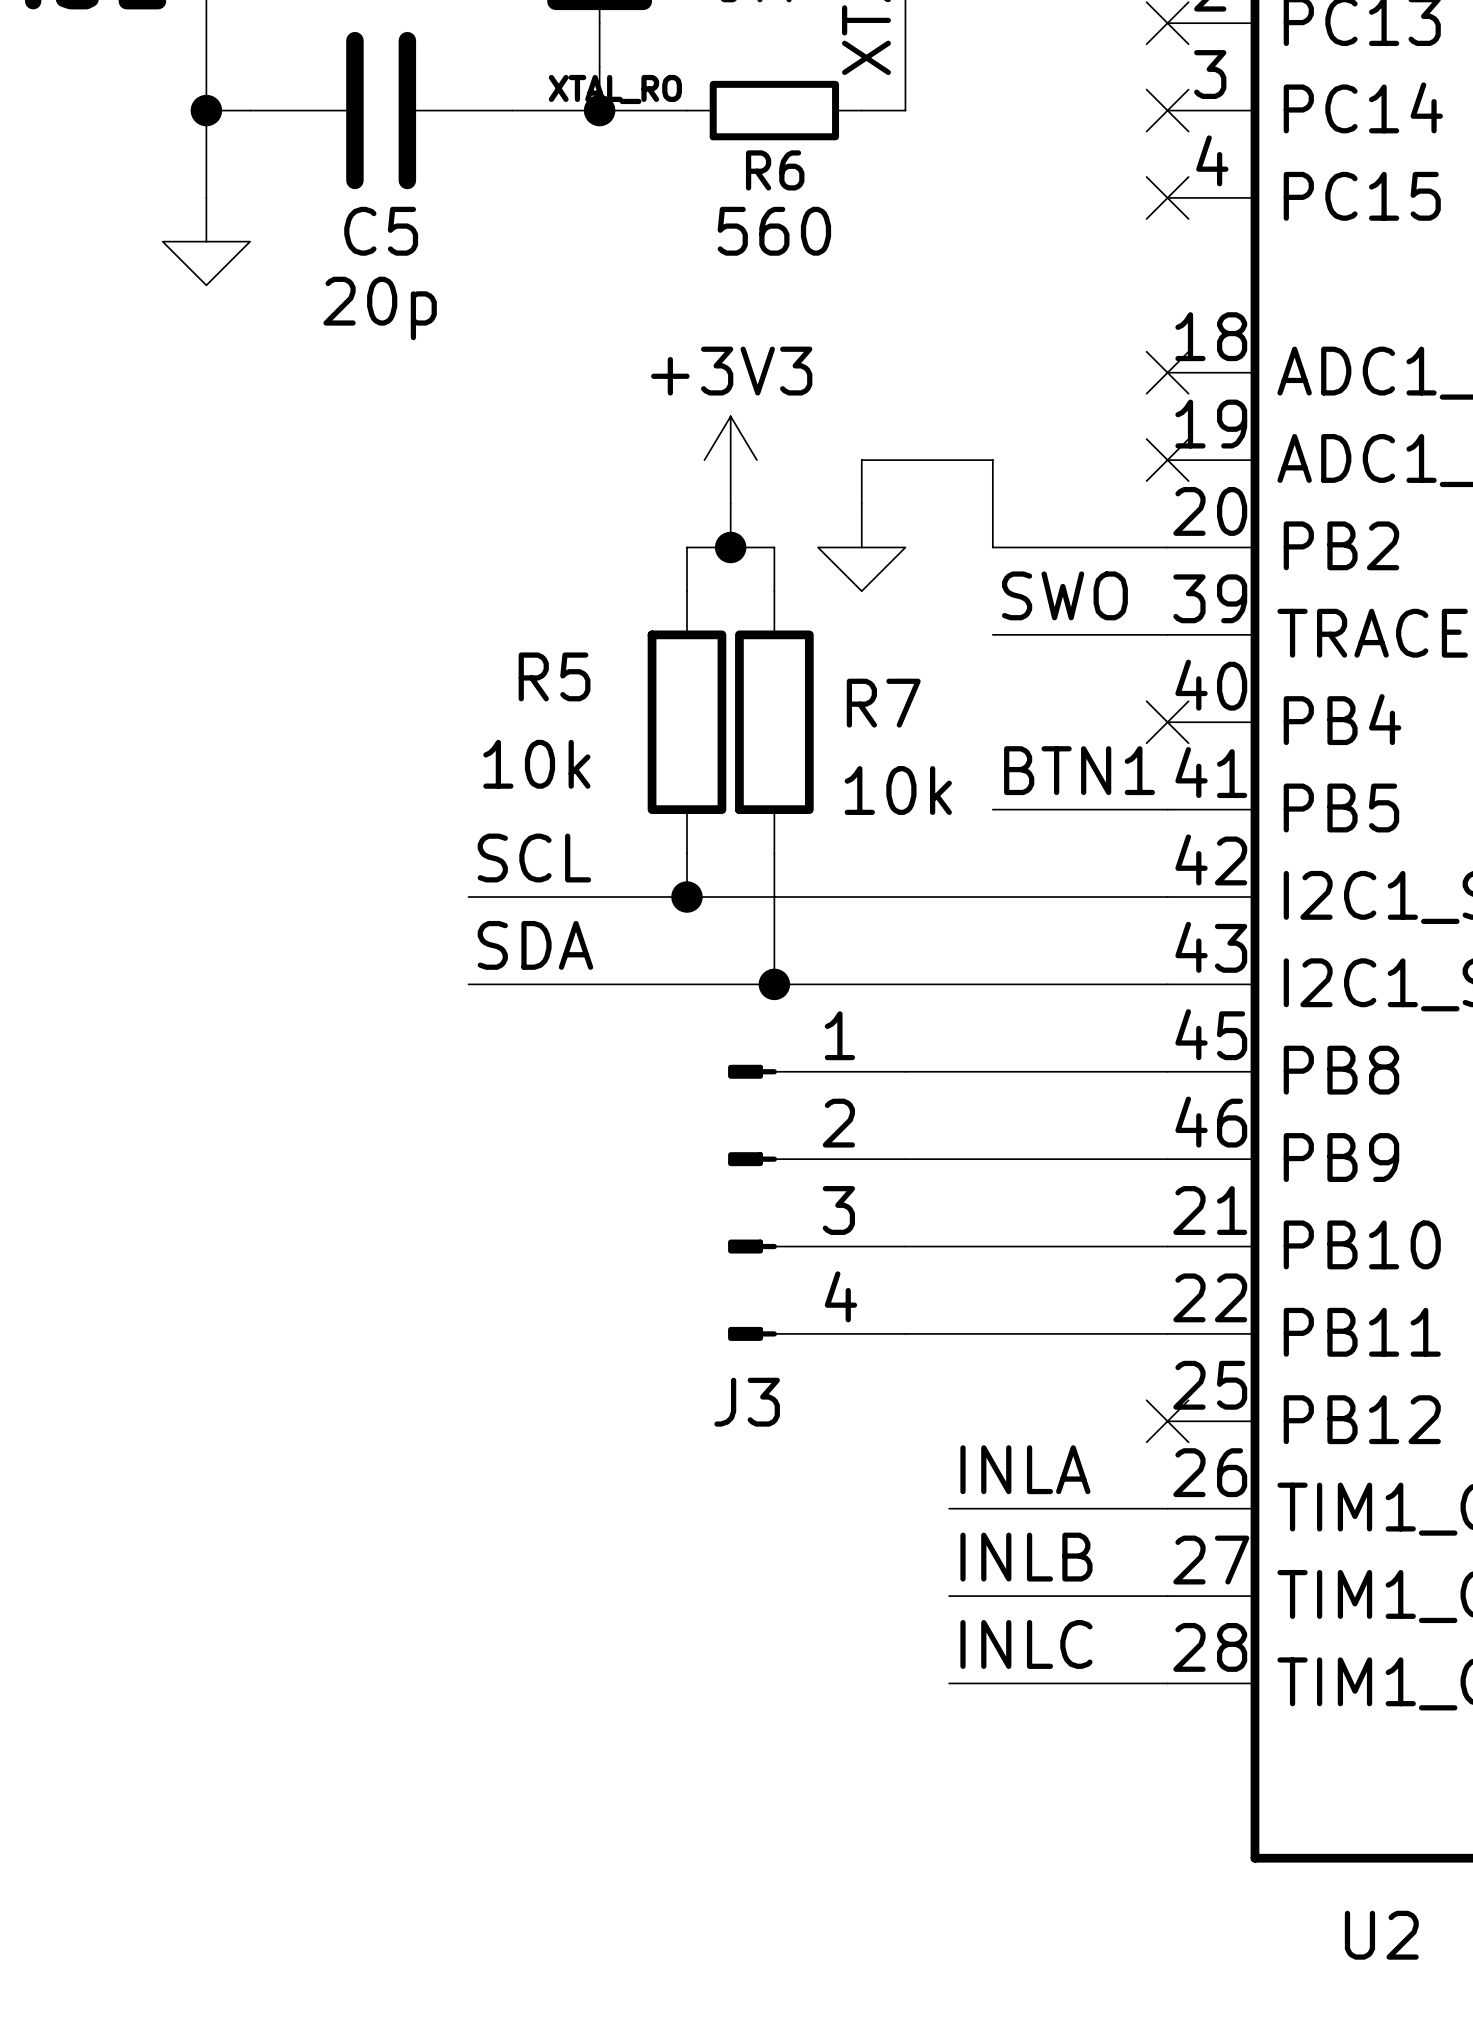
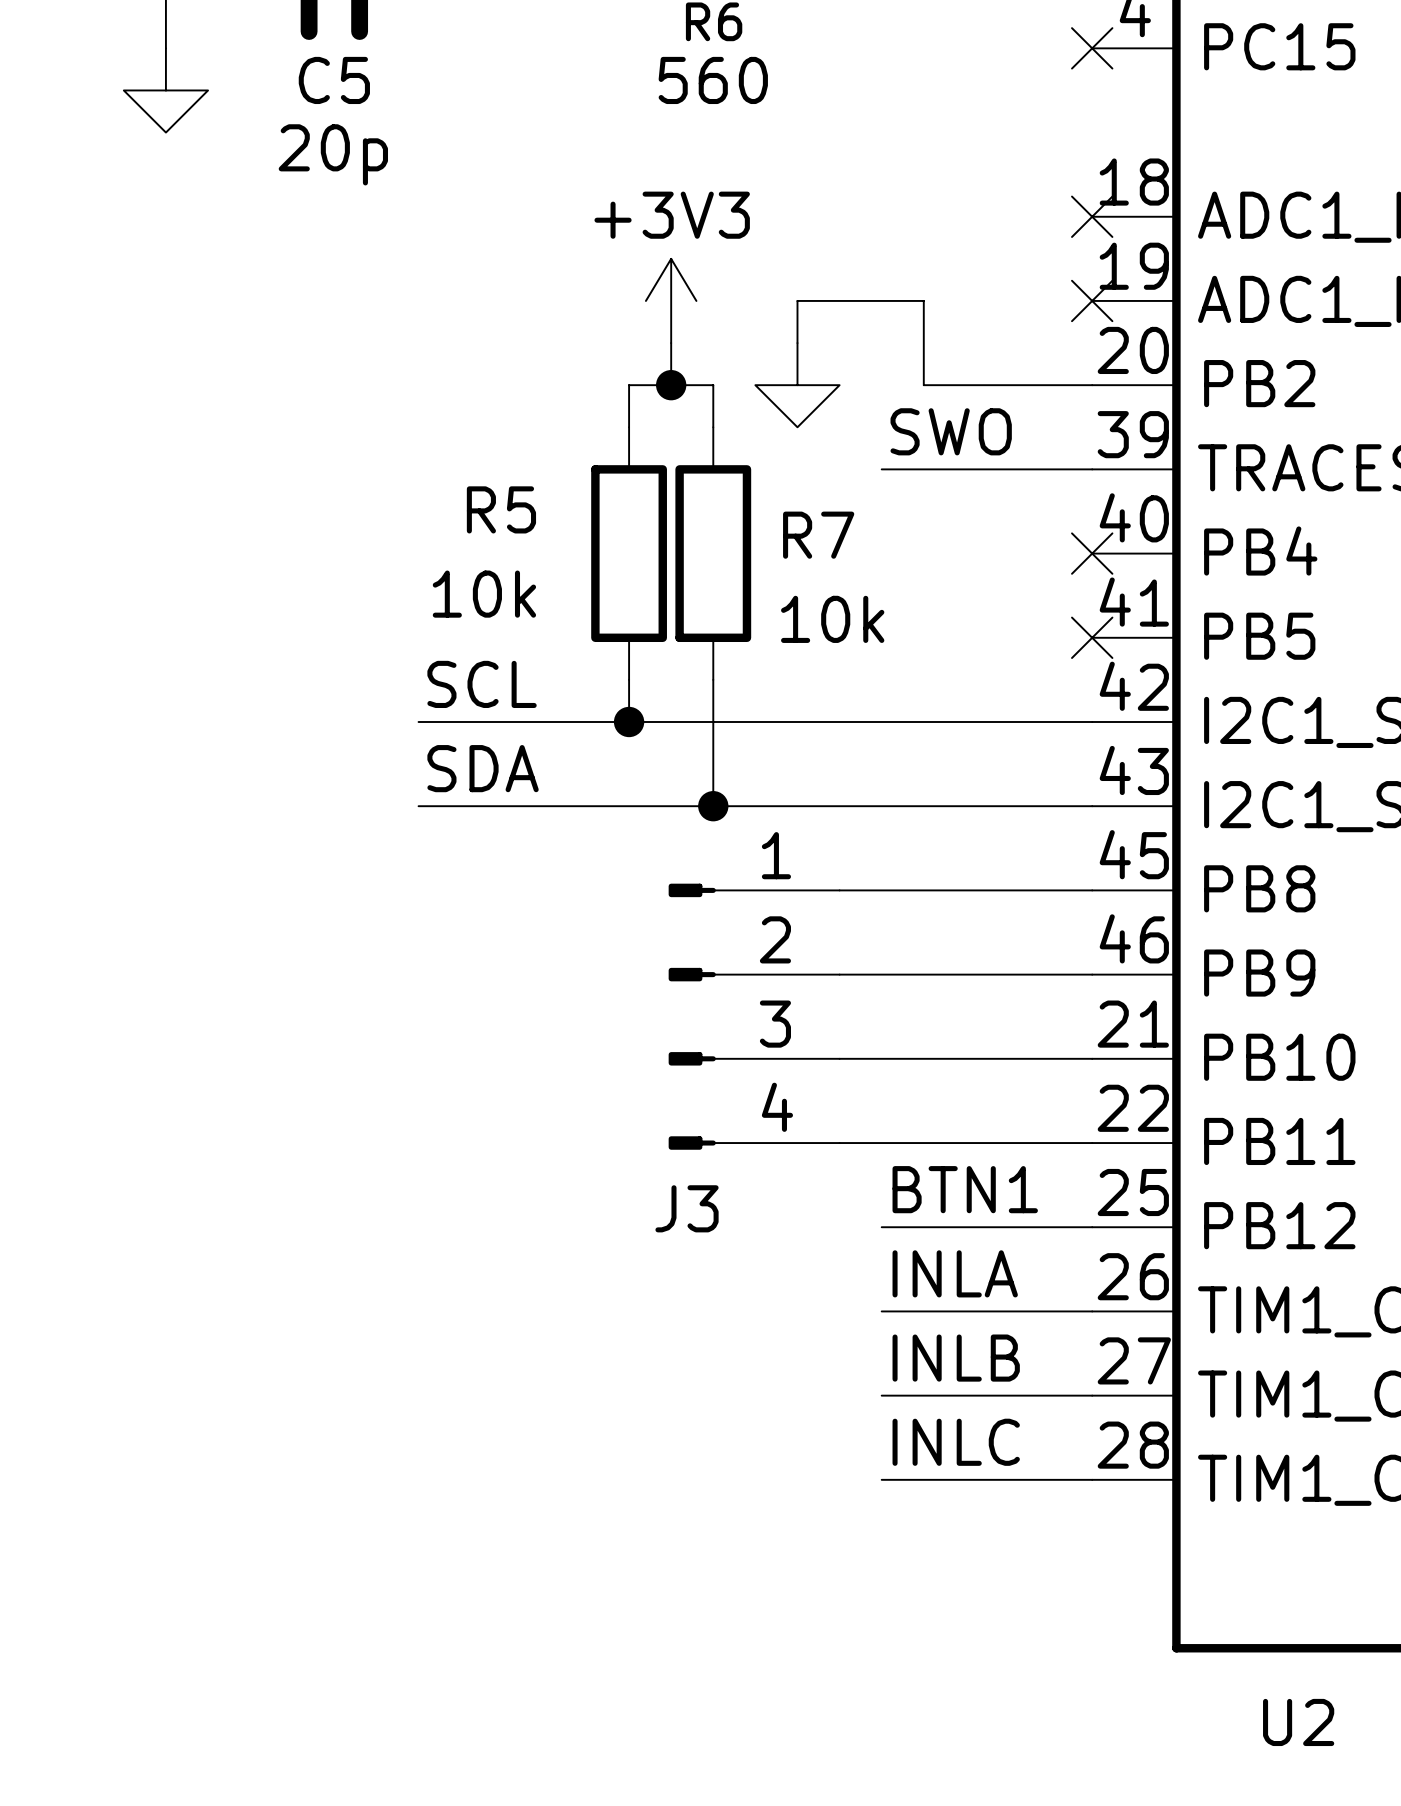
label position: SWO (1064, 595) -> SWO (951, 431)
wire: none -> (881, 469) (923, 469)
label position: BTN1 (1079, 770) -> BTN1 (965, 1189)
wire: (992, 809) (1167, 809) -> none
no-connect mark: none -> (1092, 637)
wire: none -> (881, 1227) (1092, 1227)
no-connect mark: (1167, 1421) -> none

